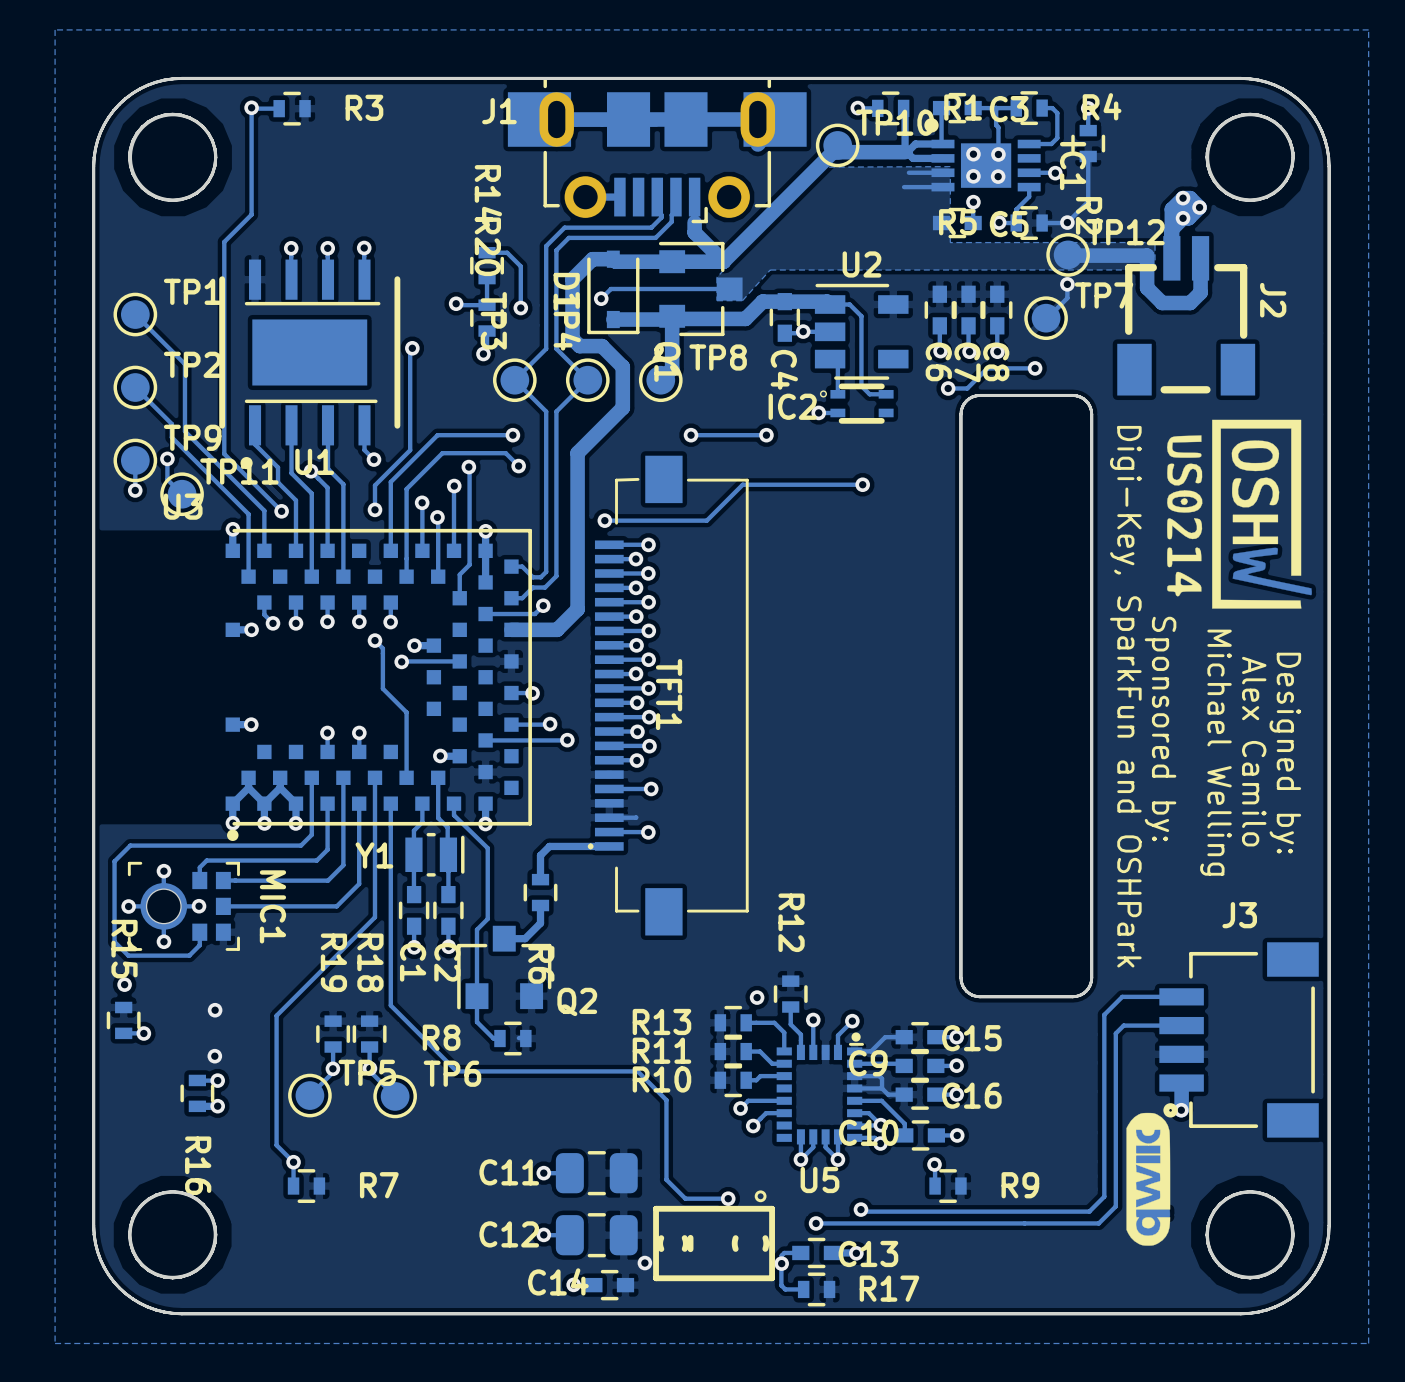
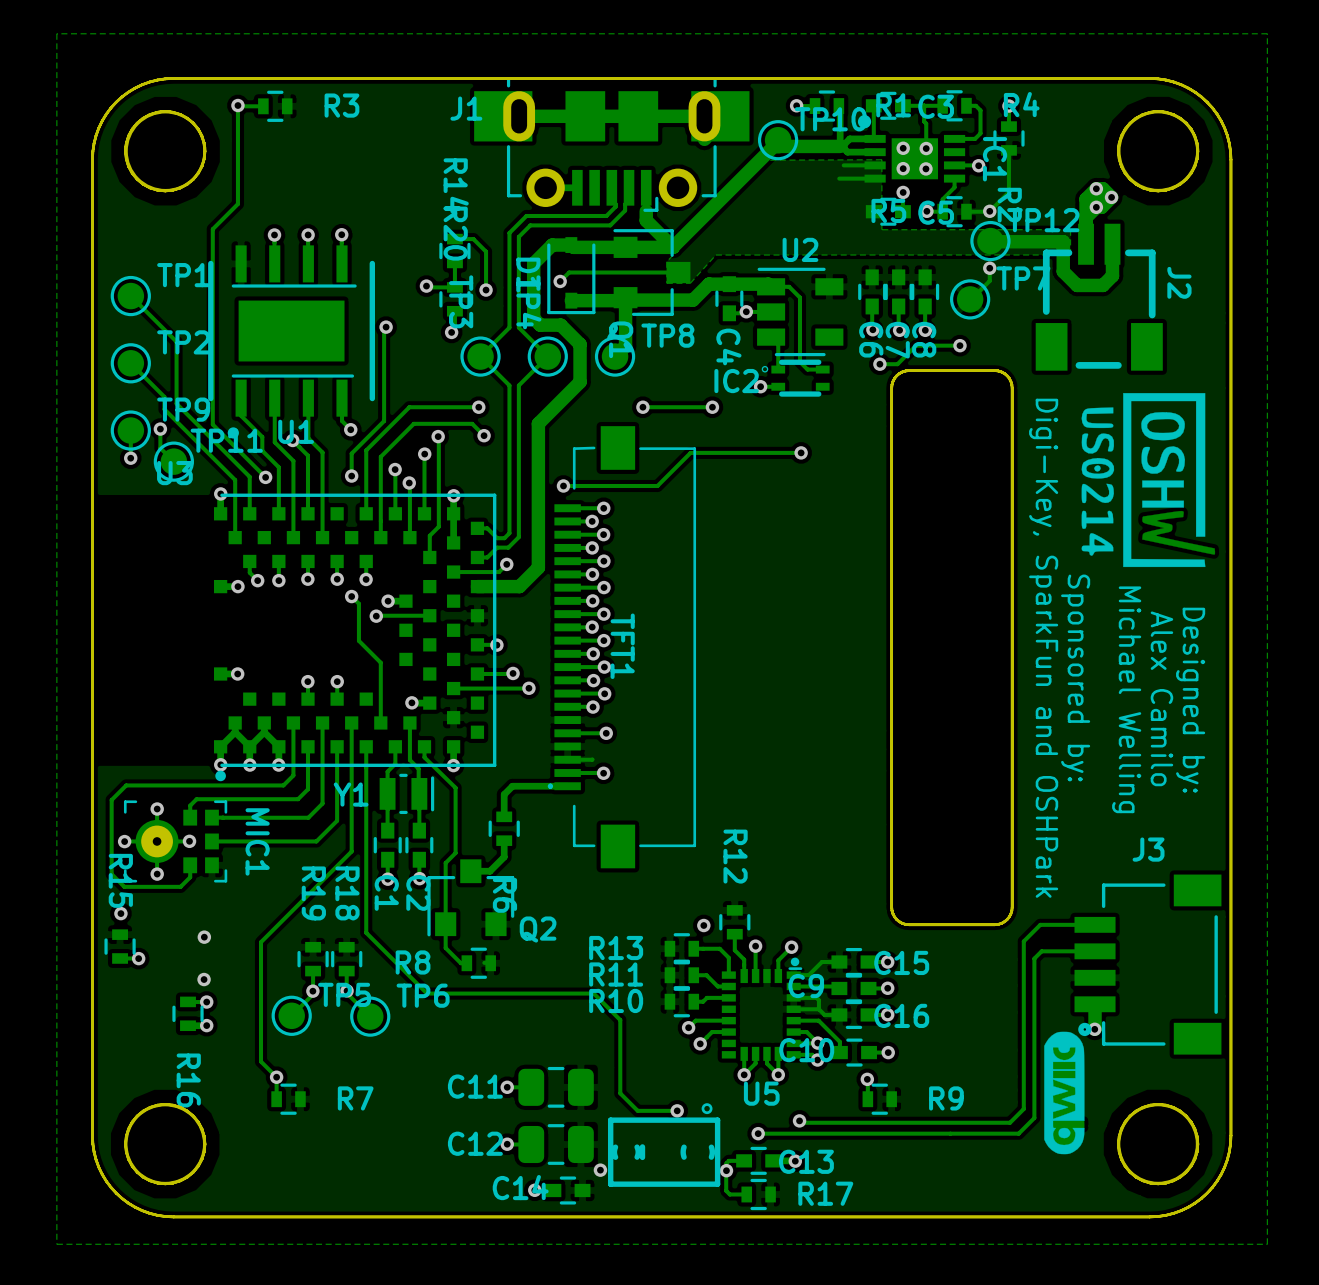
MIC1 footprint: [127, 861, 240, 951] -> [123, 800, 228, 883]

